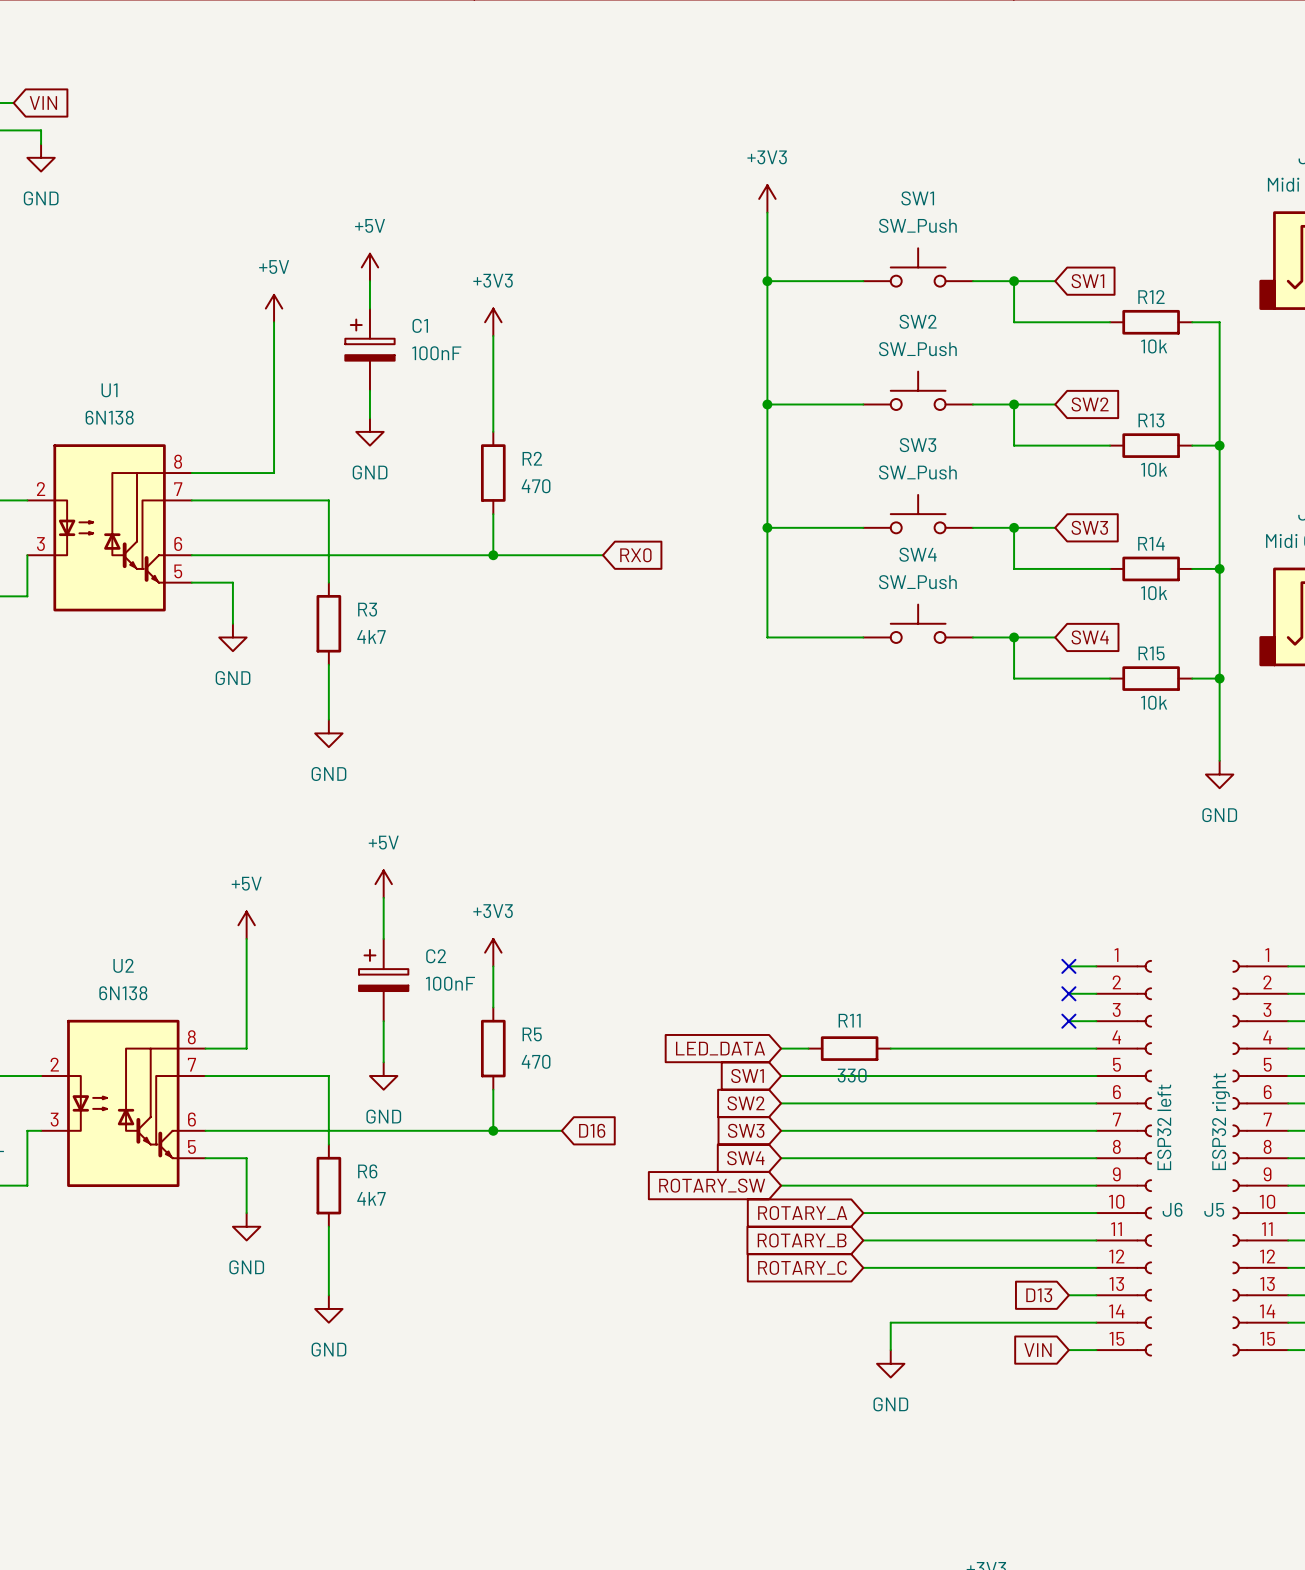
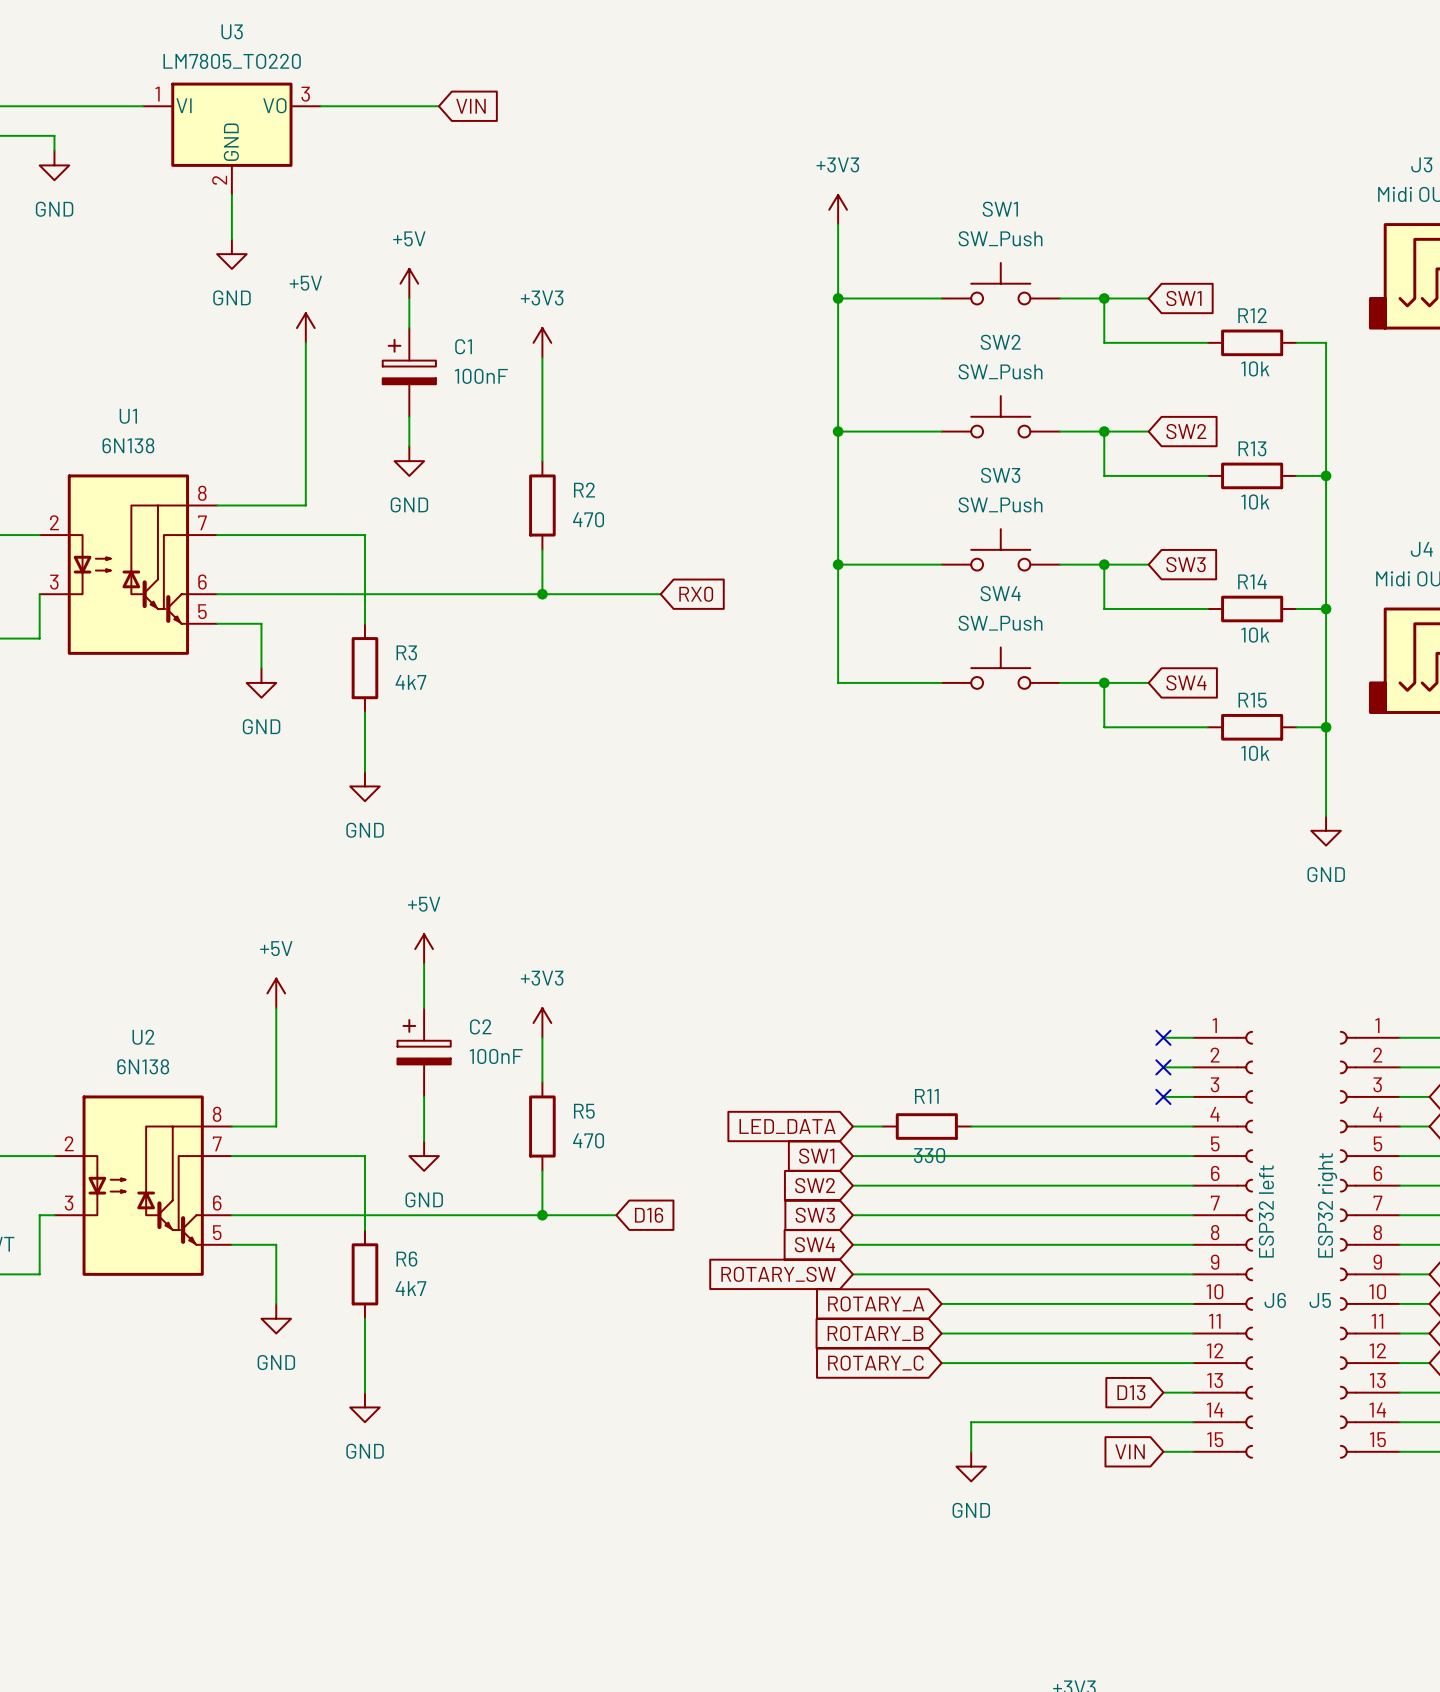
wire: none -> (24, 106) (143, 106)
global label: VIN (43, 103) -> none
wire: none -> (320, 106) (438, 106)
global label: none -> VIN (471, 106)
U3: none -> LM7805_TO220 (231, 138)
wire: none -> (231, 194) (231, 239)
power symbol: none -> GND (231, 254)

